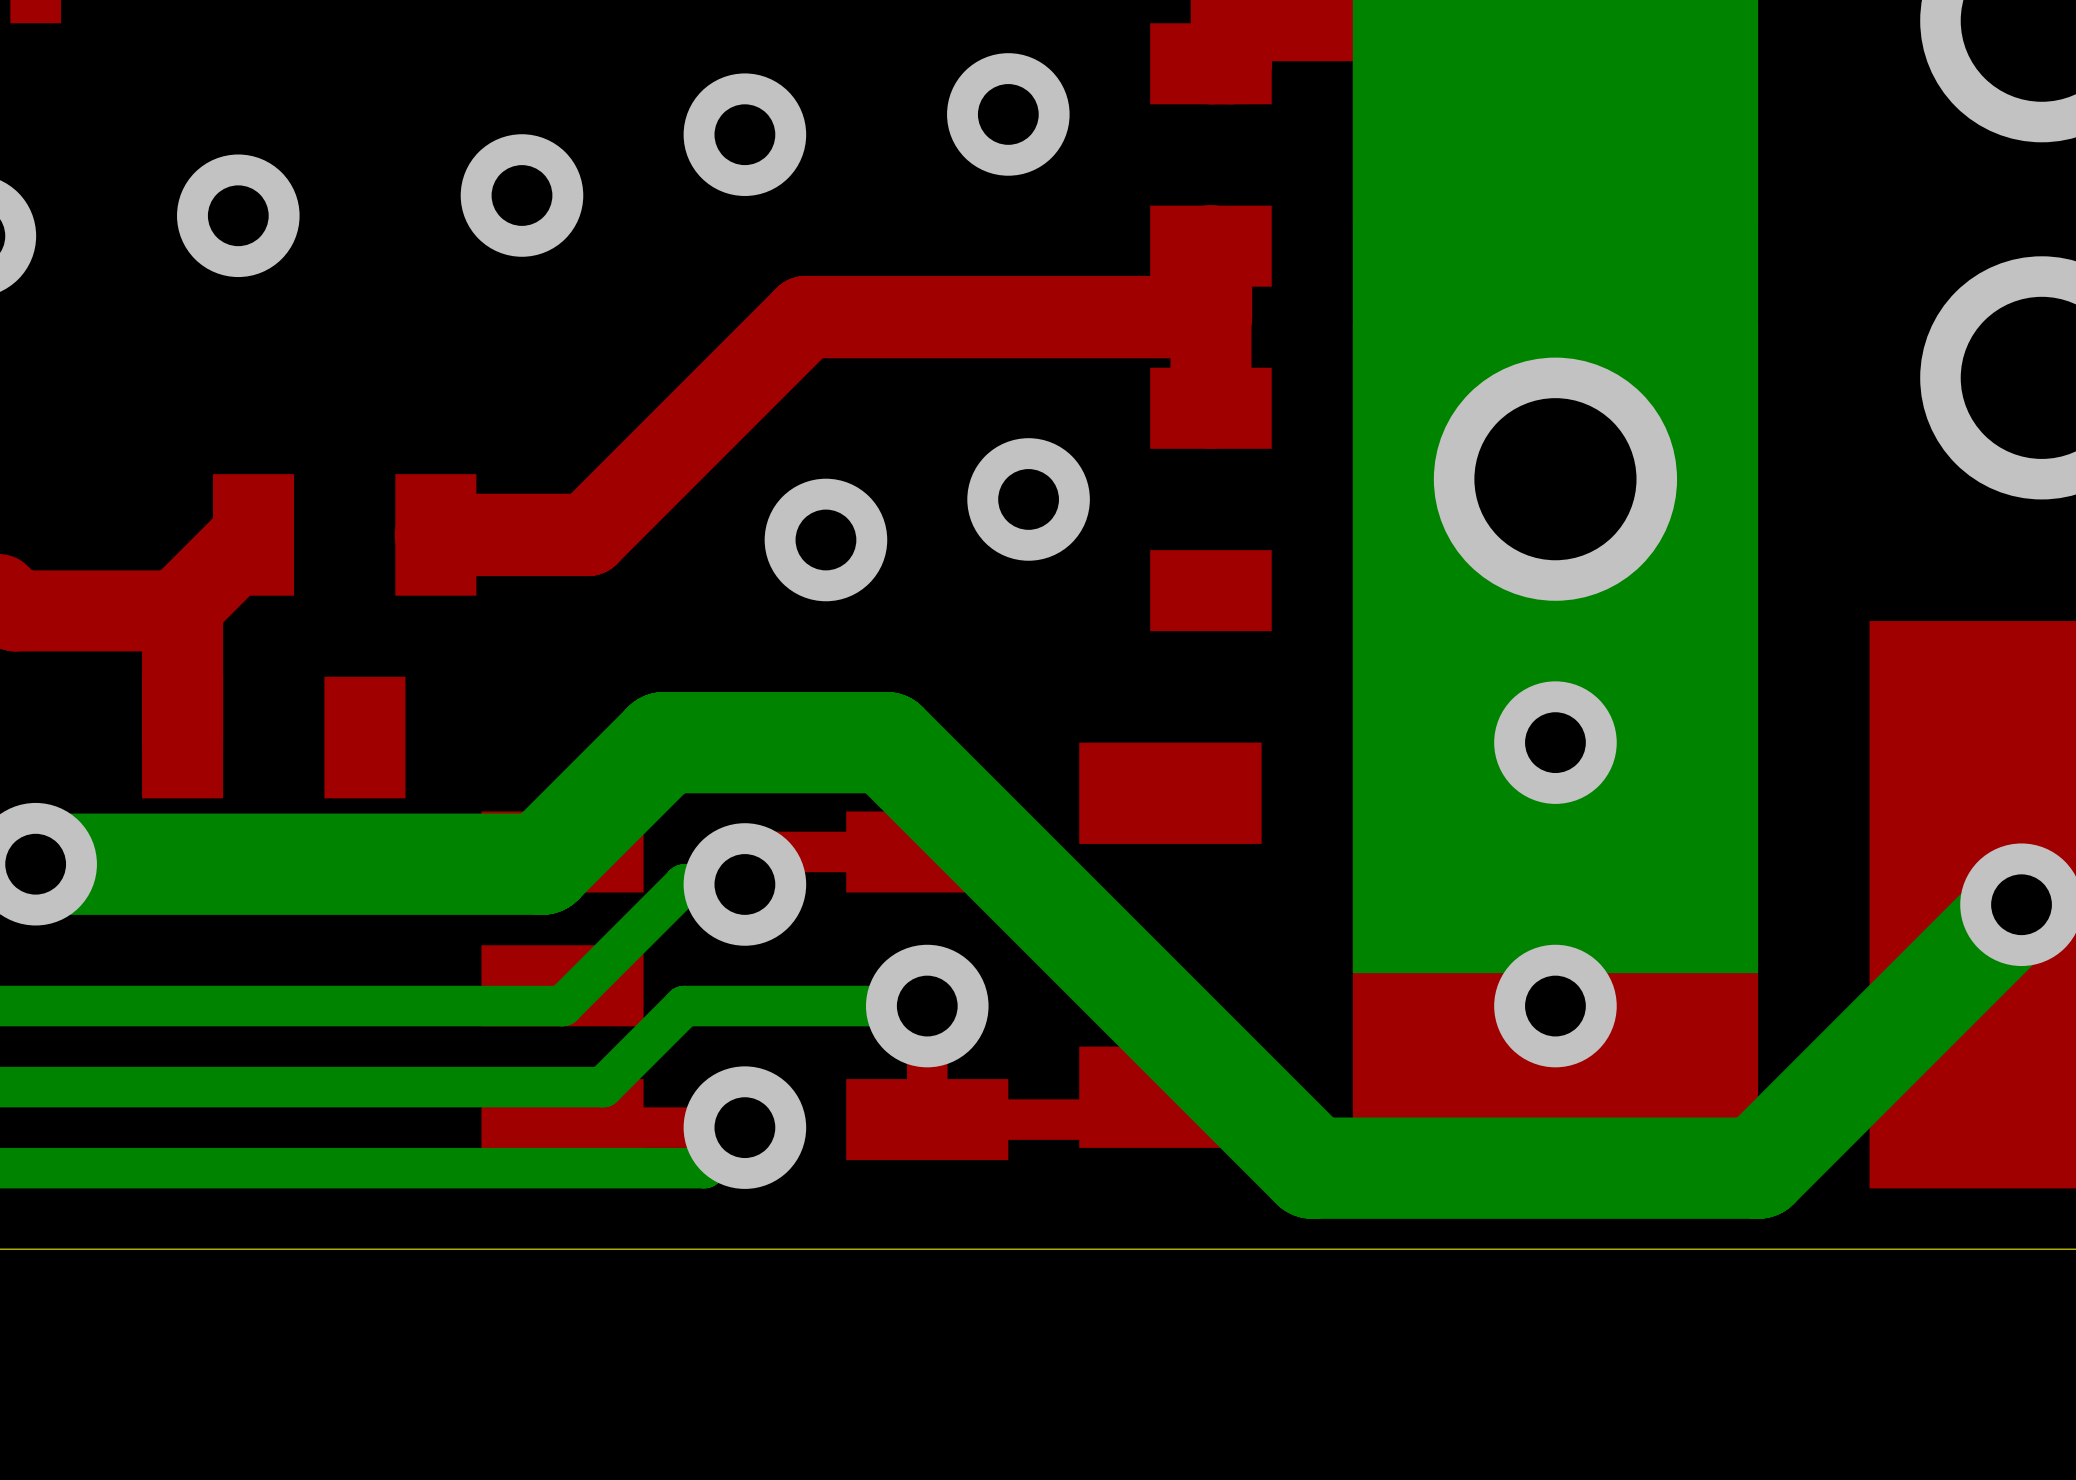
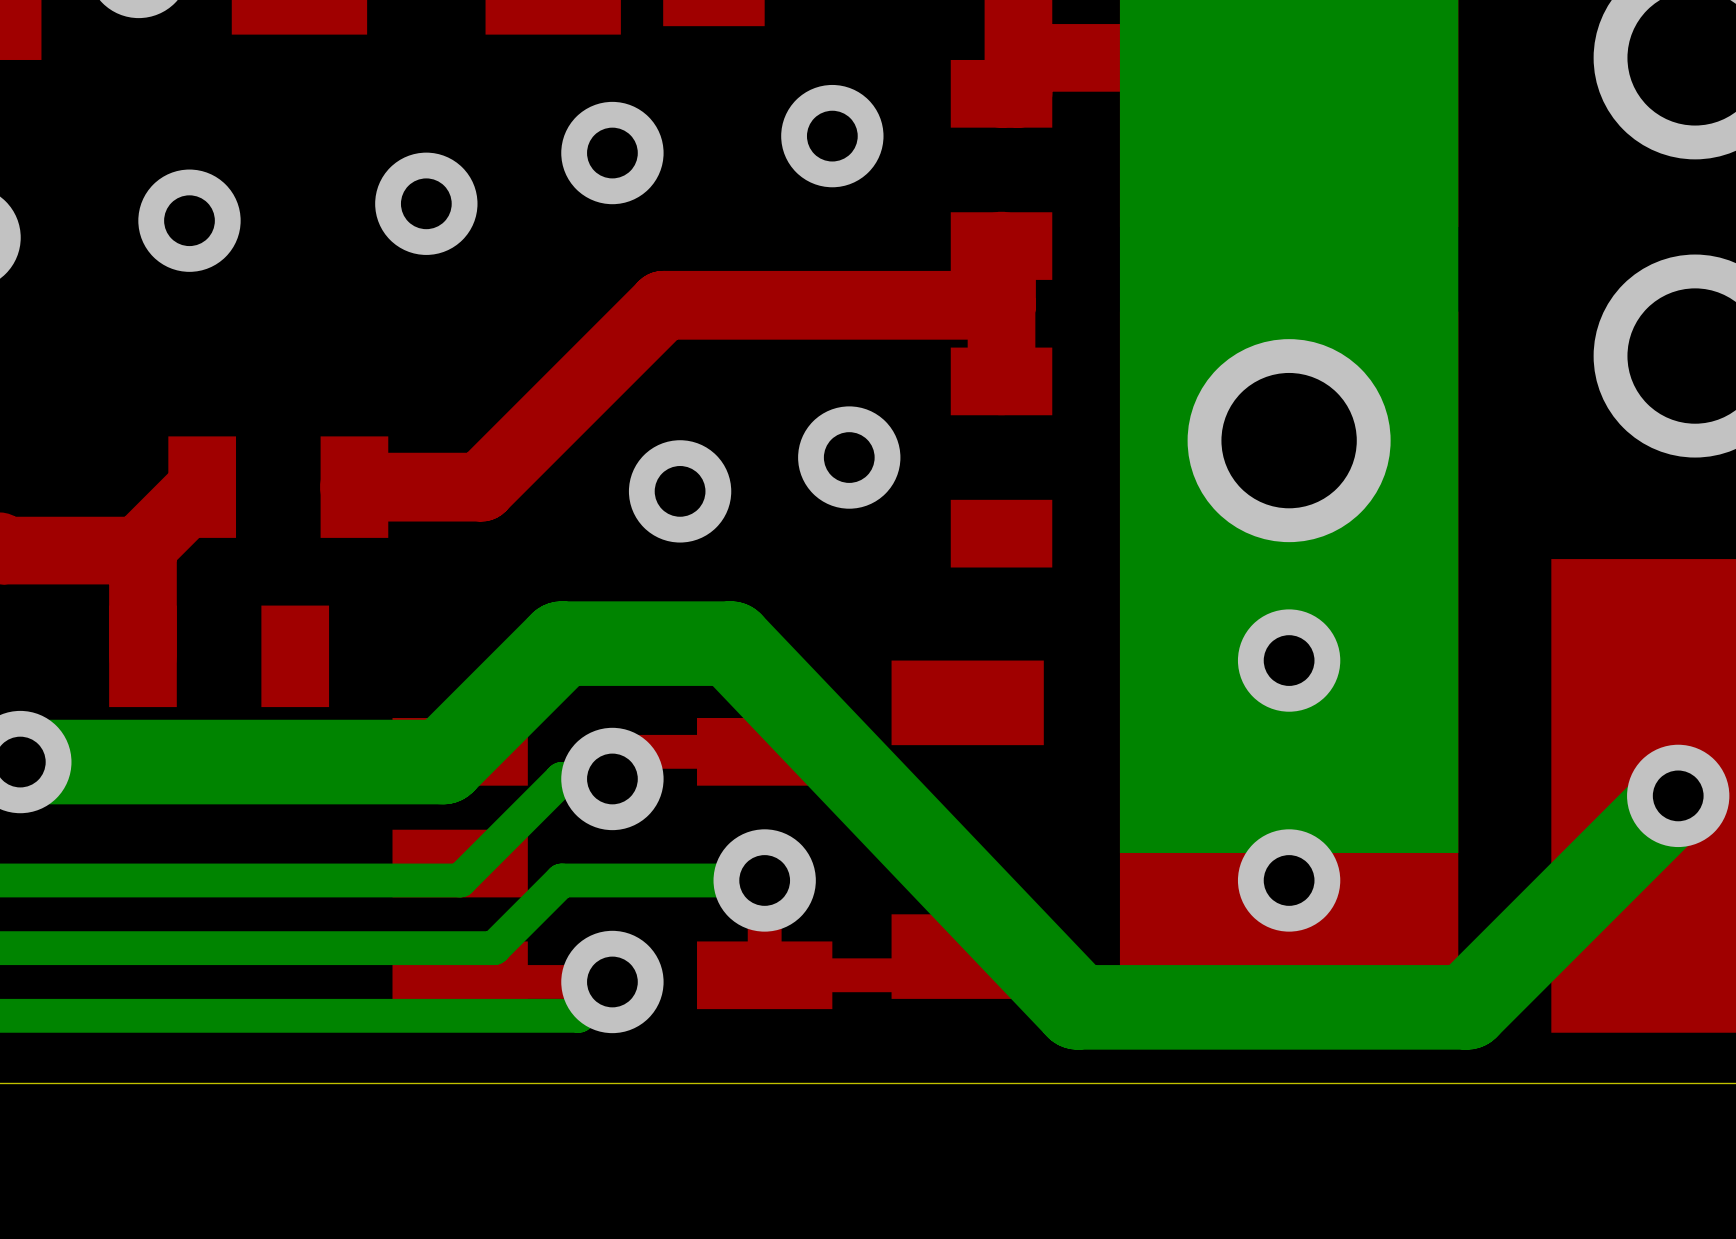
bottom track: (663, 742) (886, 742) (1312, 1168) (1758, 1168) (1768, 1158) -> (544, 660) (561, 643) (730, 643) (1077, 1007) (1466, 1007)

